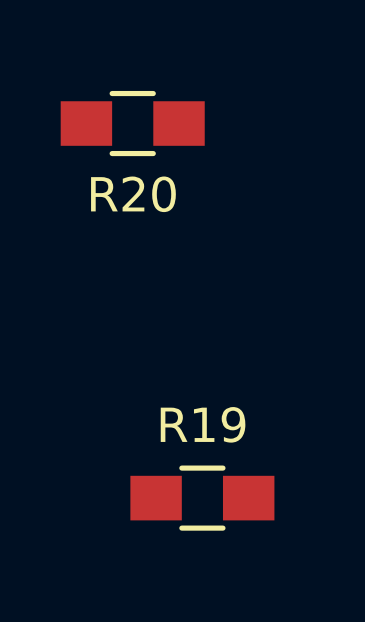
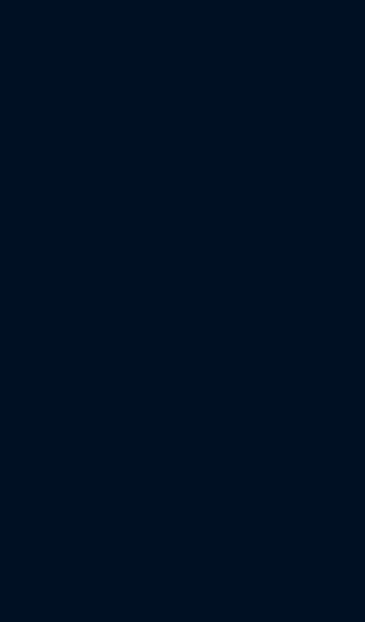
R20: (132, 123) -> none
R19: (202, 498) -> none

